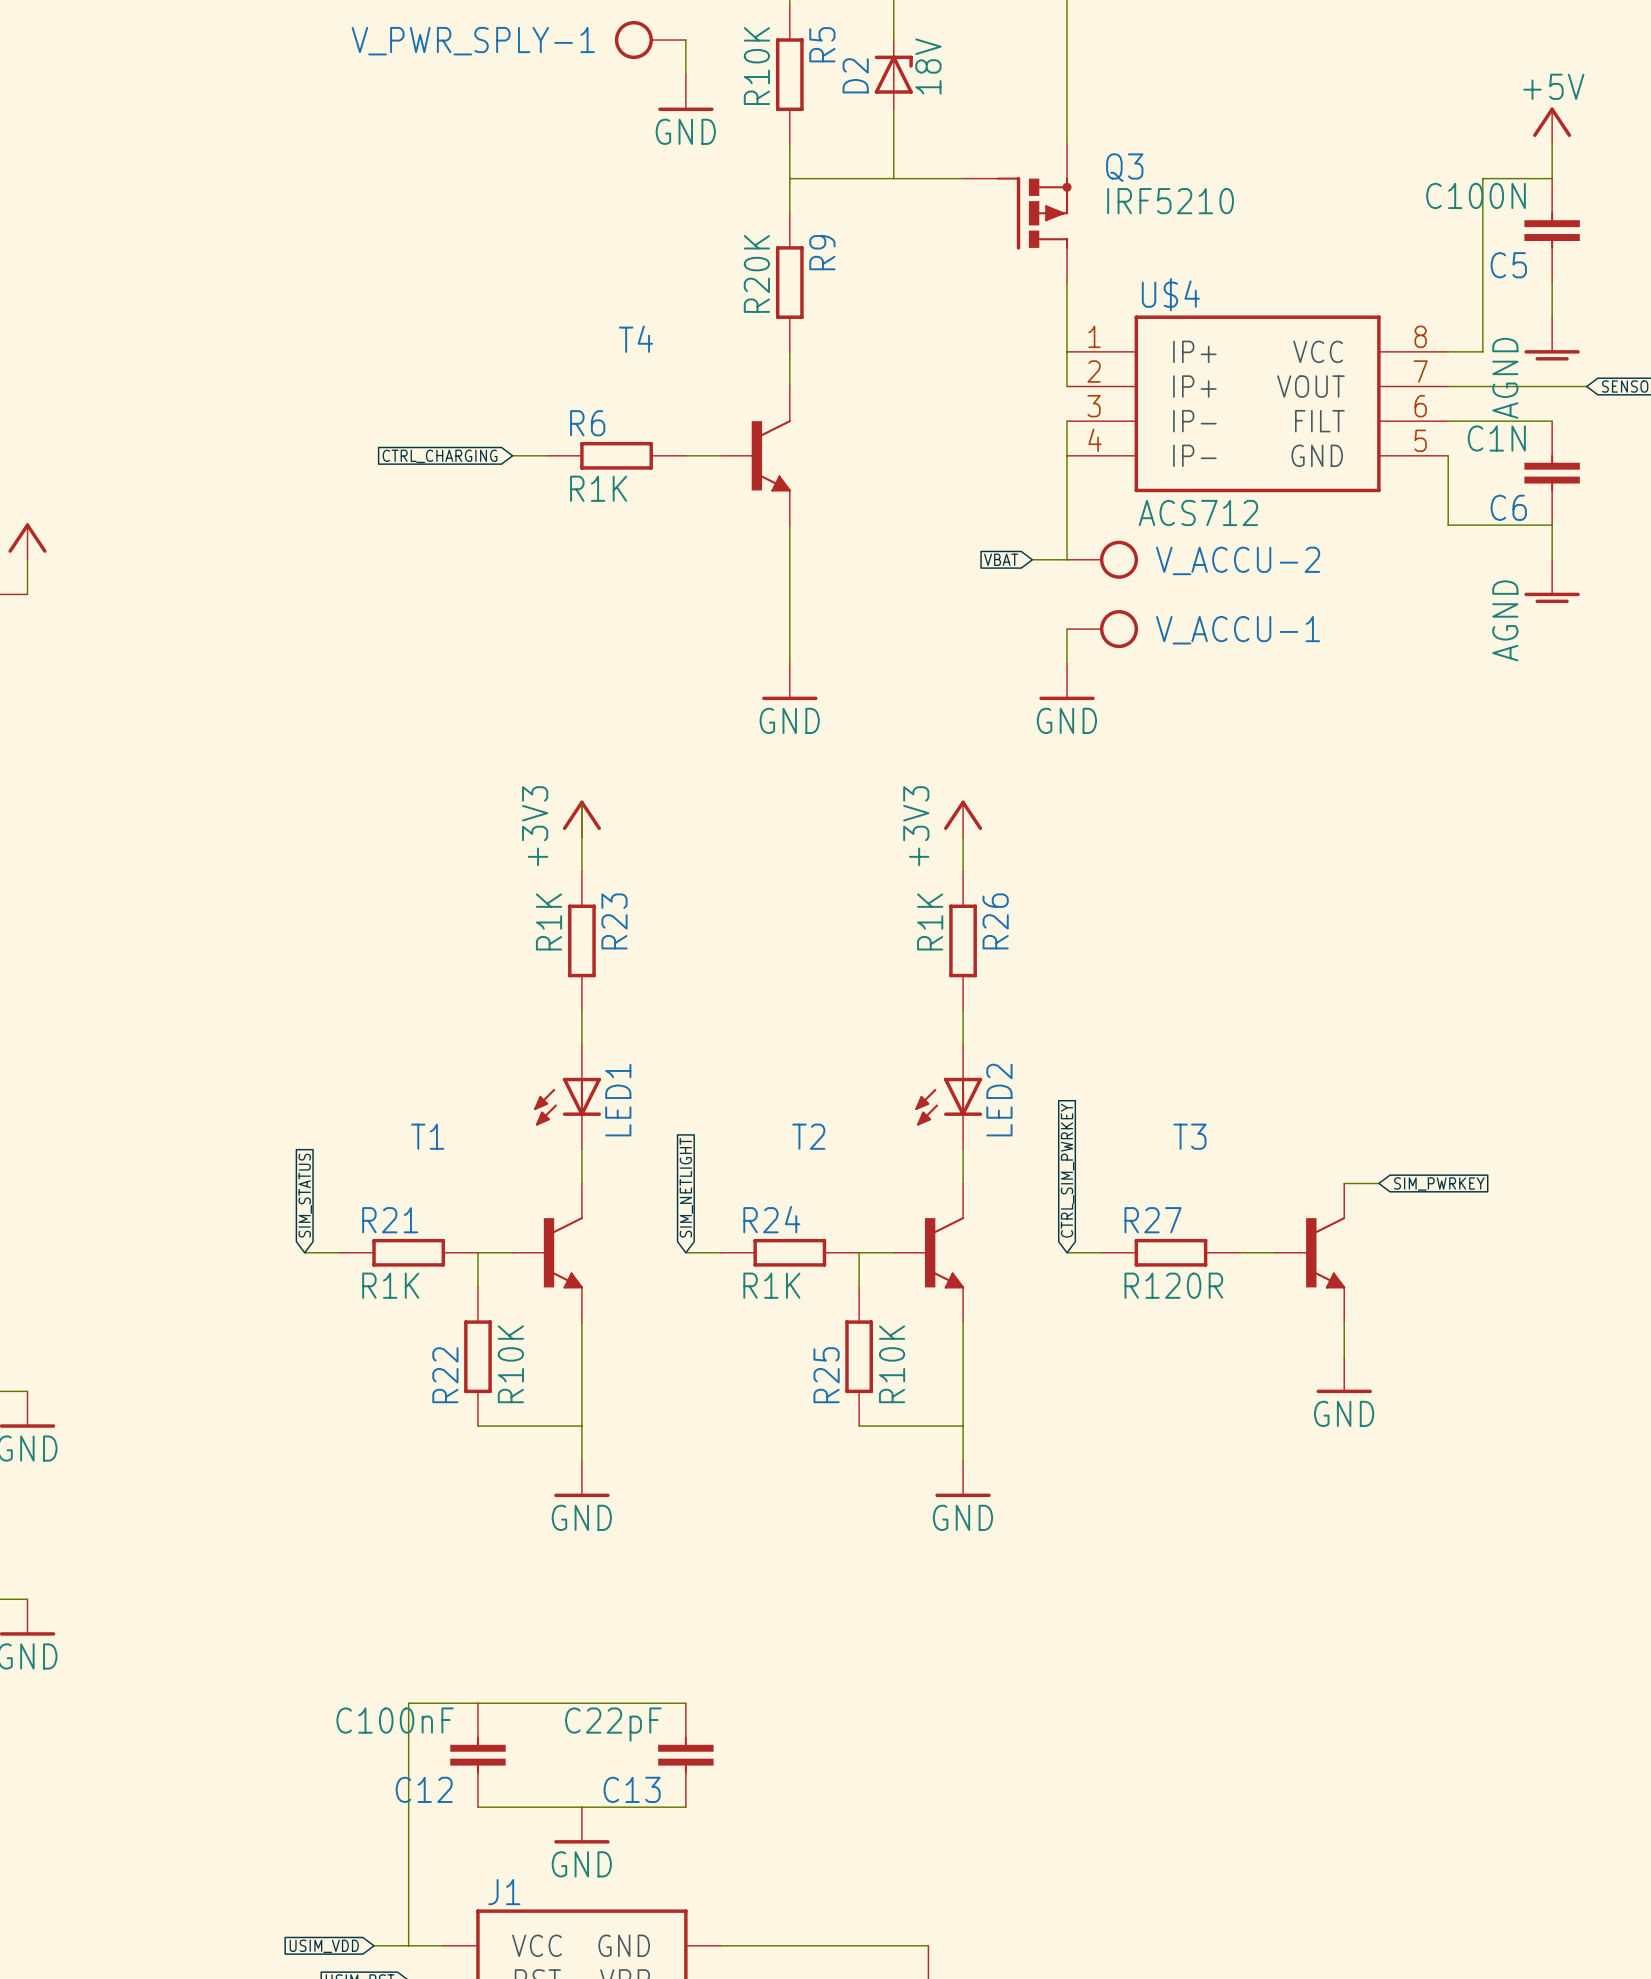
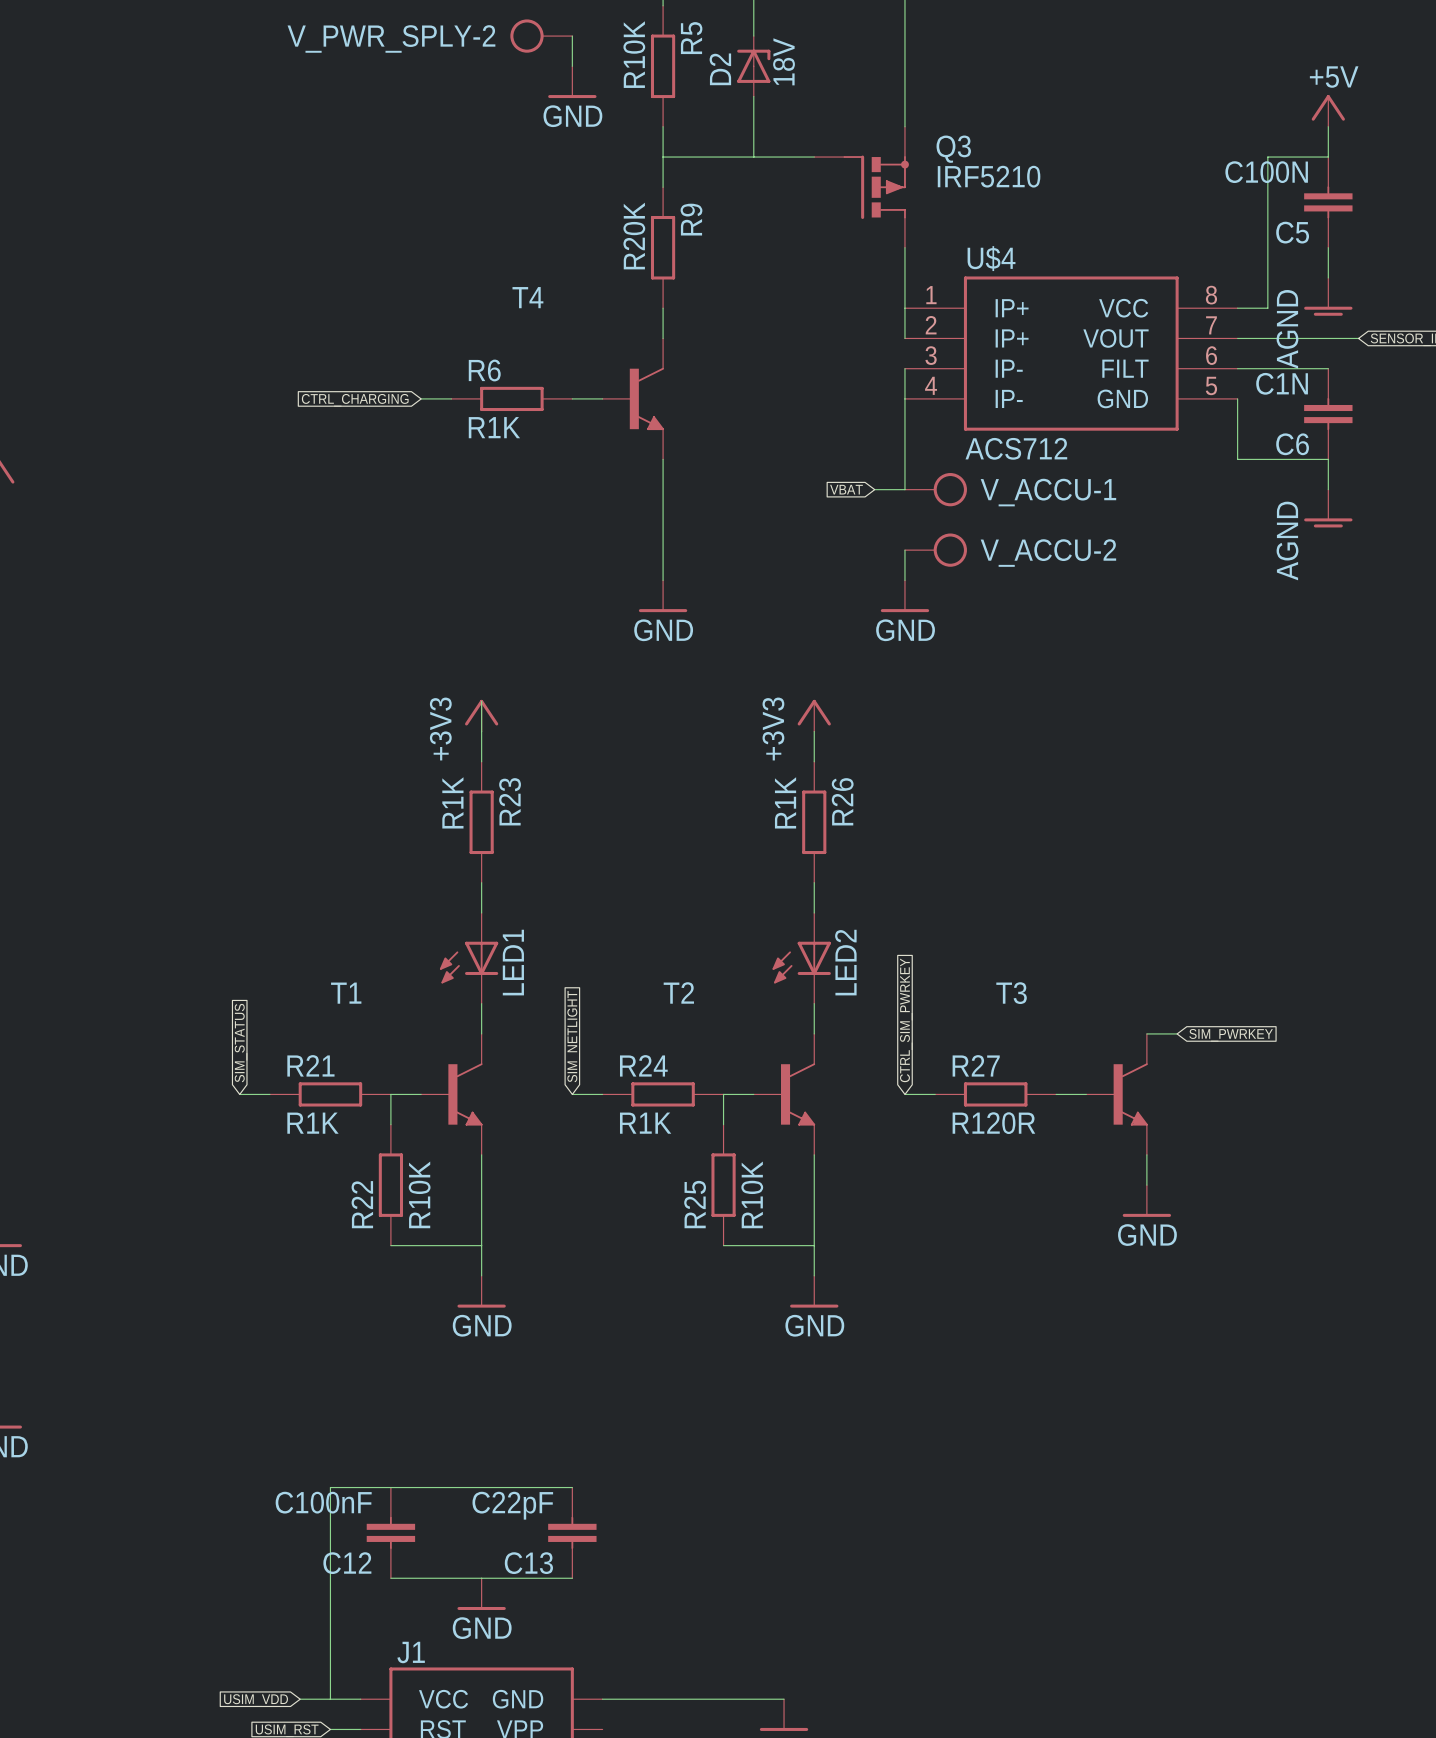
V_PWR_SPLY-1 name: V_PWR_SPLY-1 (473, 41) -> V_PWR_SPLY-2 (391, 38)
V_ACCU-2 name: V_ACCU-2 (1238, 560) -> V_ACCU-1 (1048, 492)
V_ACCU-1 name: V_ACCU-1 (1238, 630) -> V_ACCU-2 (1048, 553)

